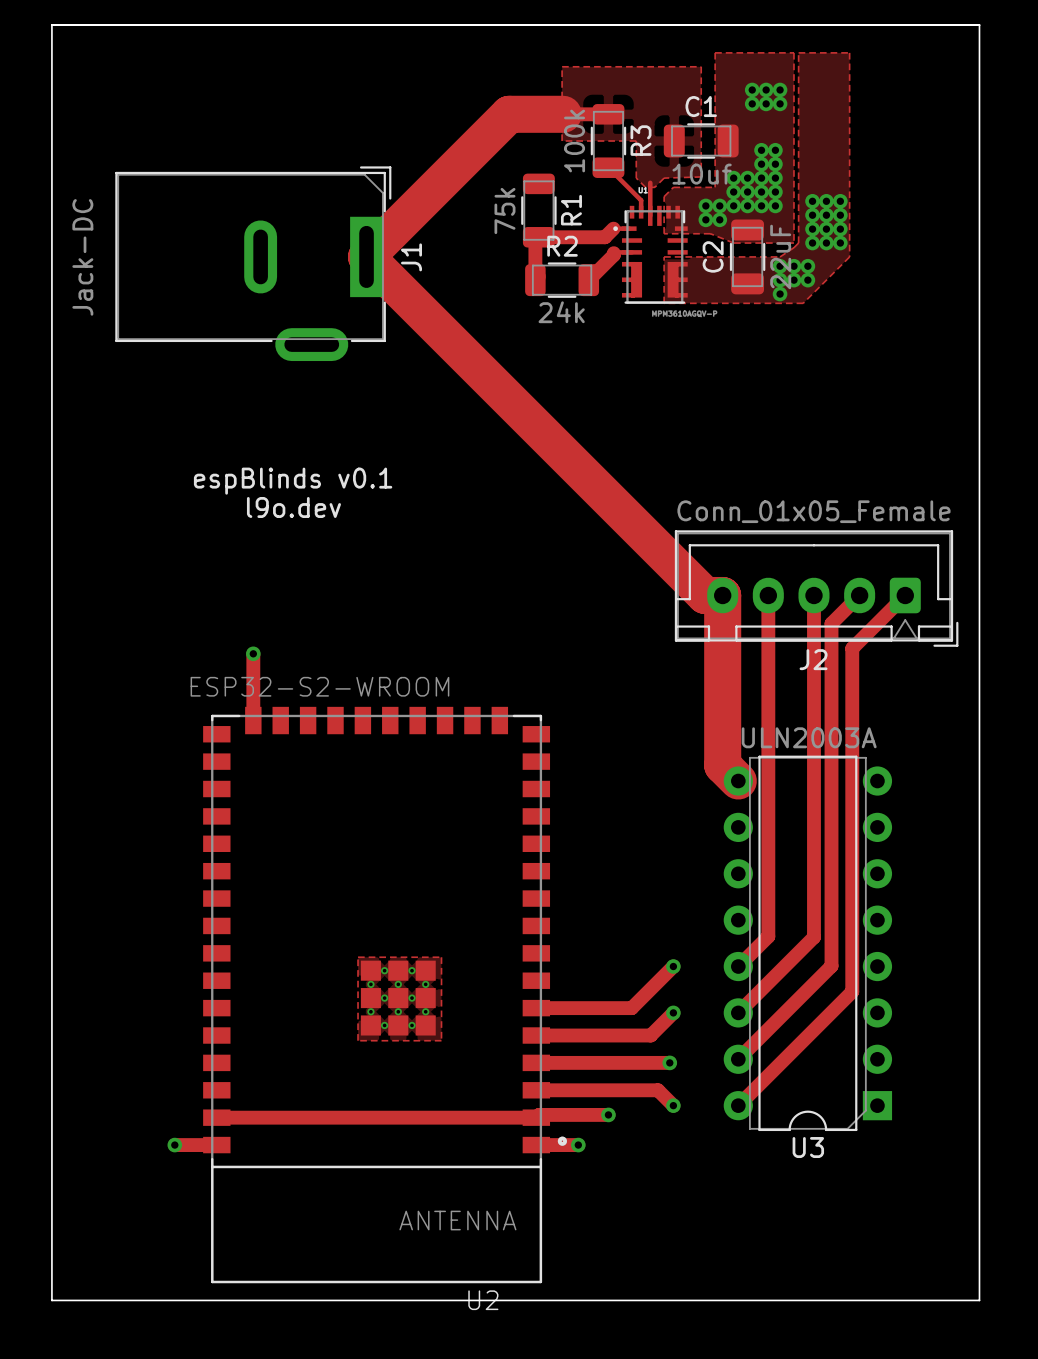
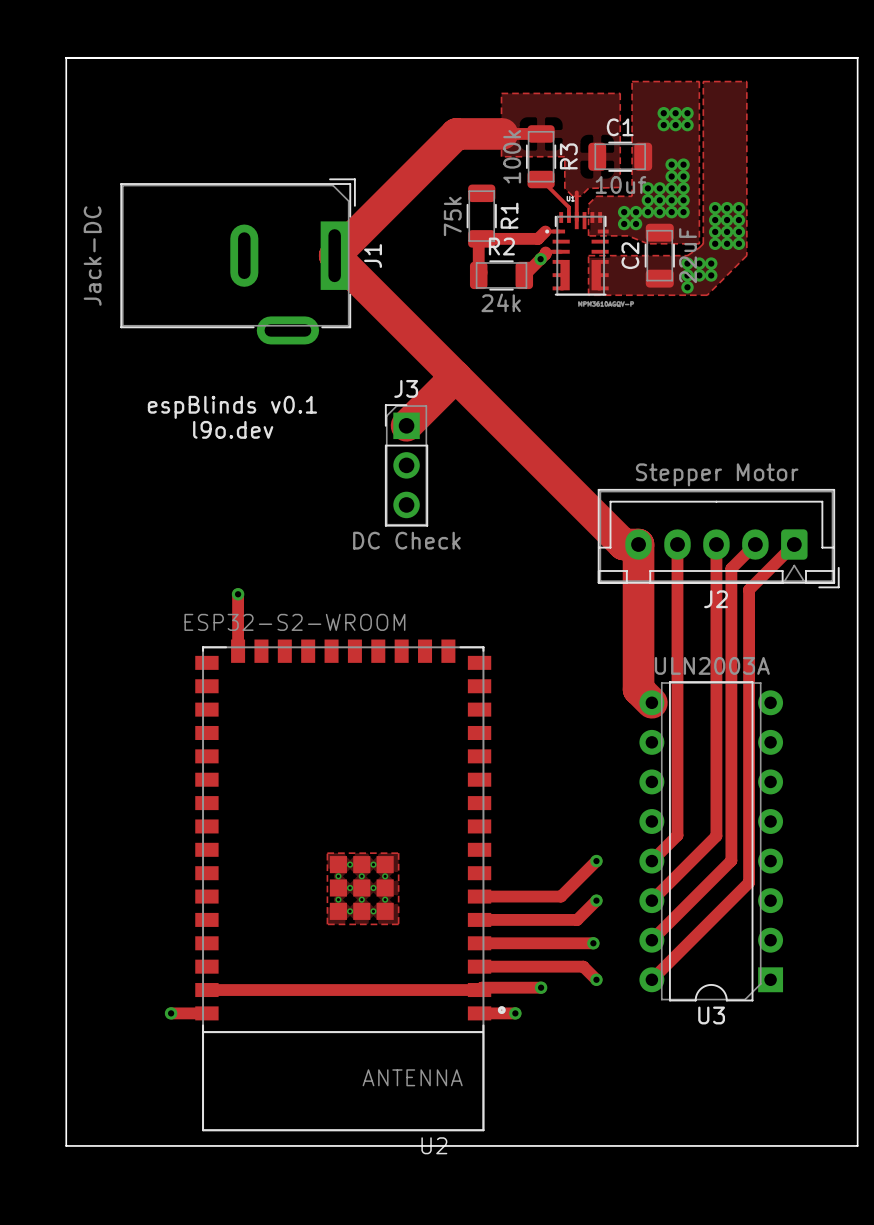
via: none -> (540, 259)
track: none -> (455, 376) (406, 425)
text position: espBlinds v0.1 (293, 481) -> espBlinds v0.1 (232, 407)
J3: none -> DC Check (406, 465)
text position: l9o.dev (293, 507) -> l9o.dev (233, 429)
J2 value: Conn_01x05_Female (813, 511) -> Stepper Motor (717, 474)

